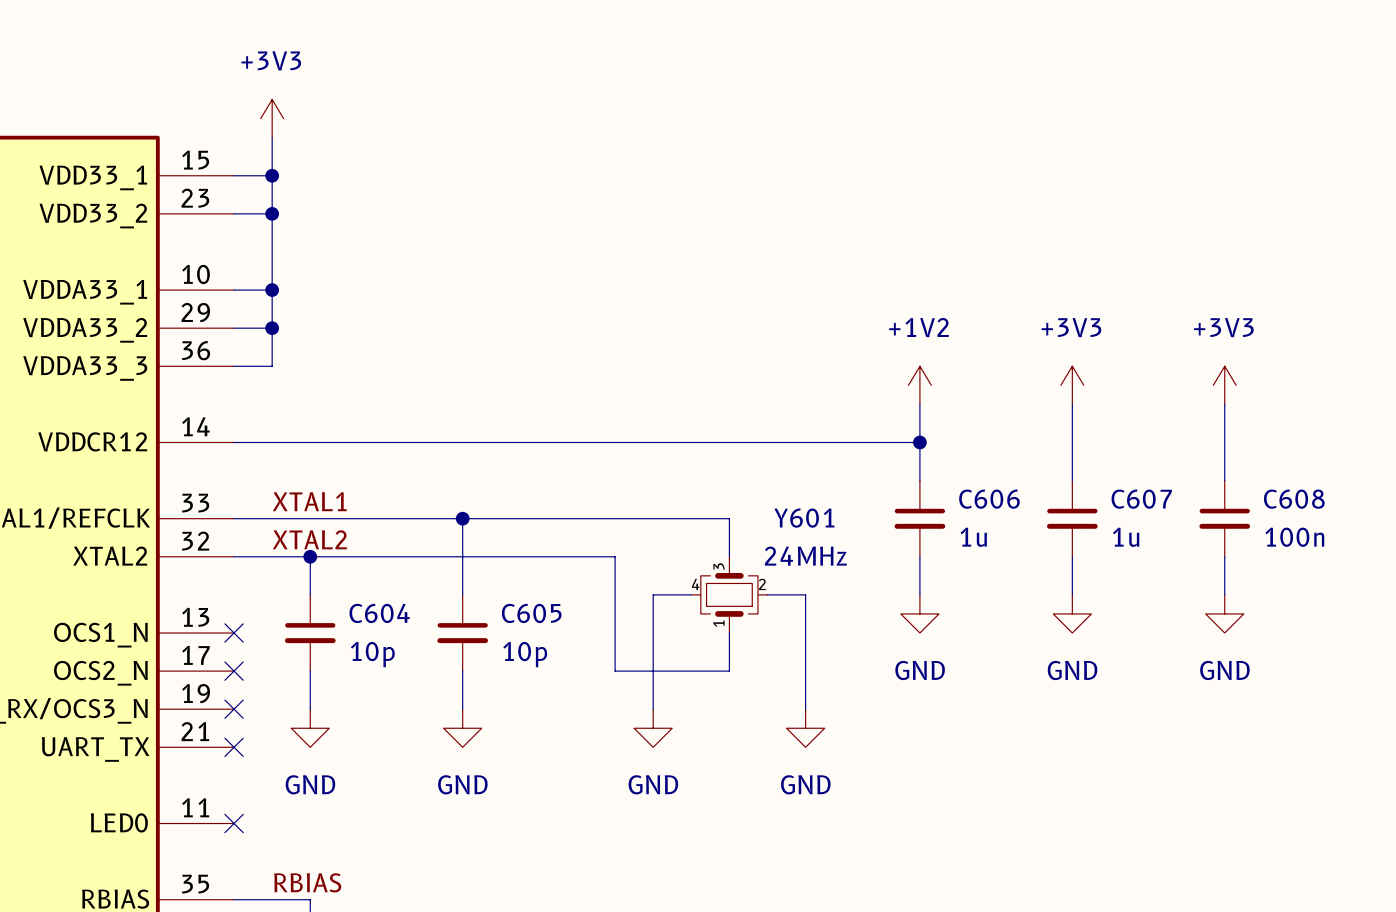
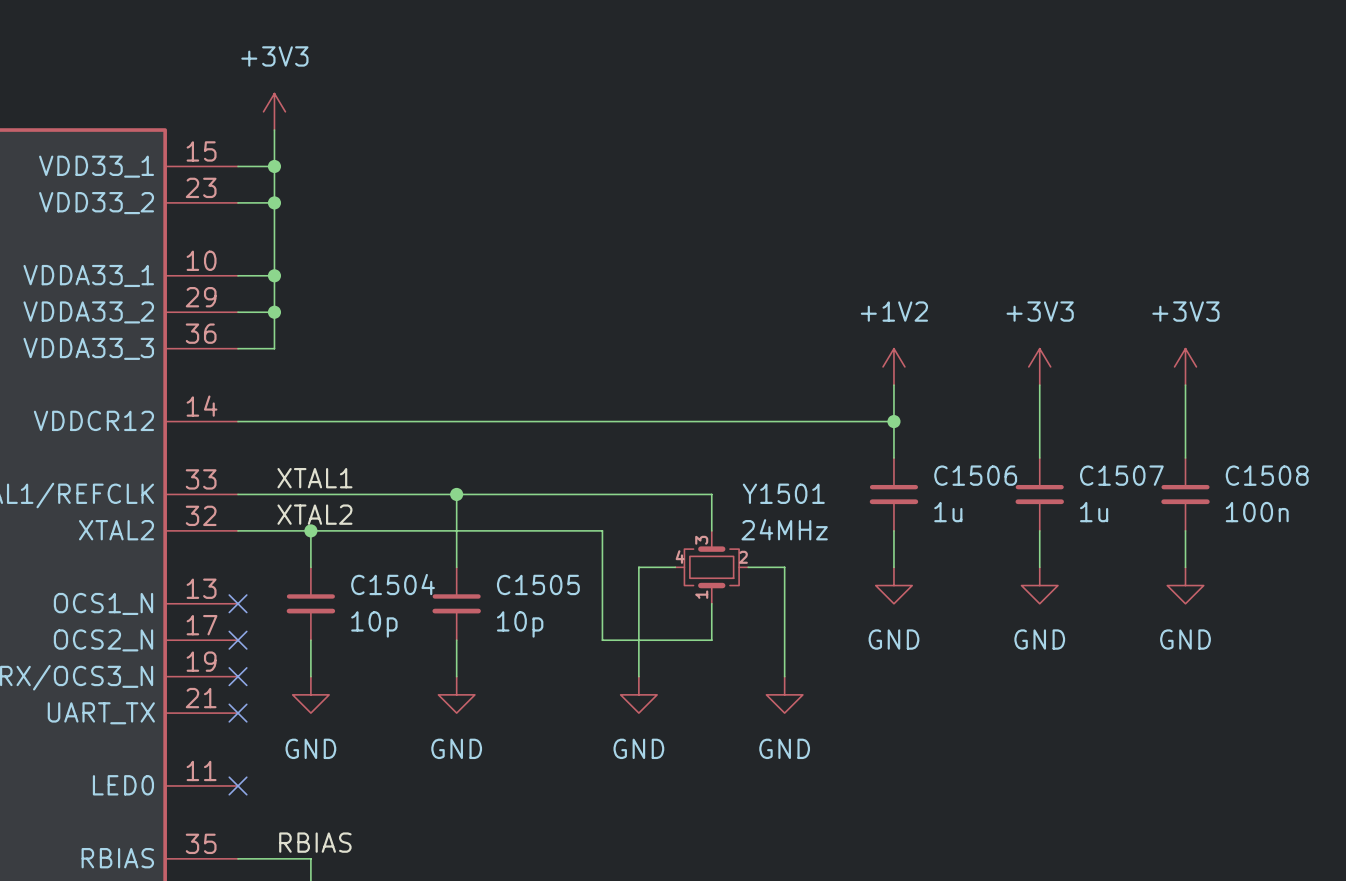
C606 name: C606 (989, 499) -> C1506 (975, 475)
C607 name: C607 (1141, 499) -> C1507 (1121, 475)
C608 name: C608 (1294, 499) -> C1508 (1267, 475)
Y601 name: Y601 (804, 518) -> Y1501 (783, 493)
C604 name: C604 (379, 613) -> C1504 (393, 584)
C605 name: C605 (531, 613) -> C1505 (538, 584)

